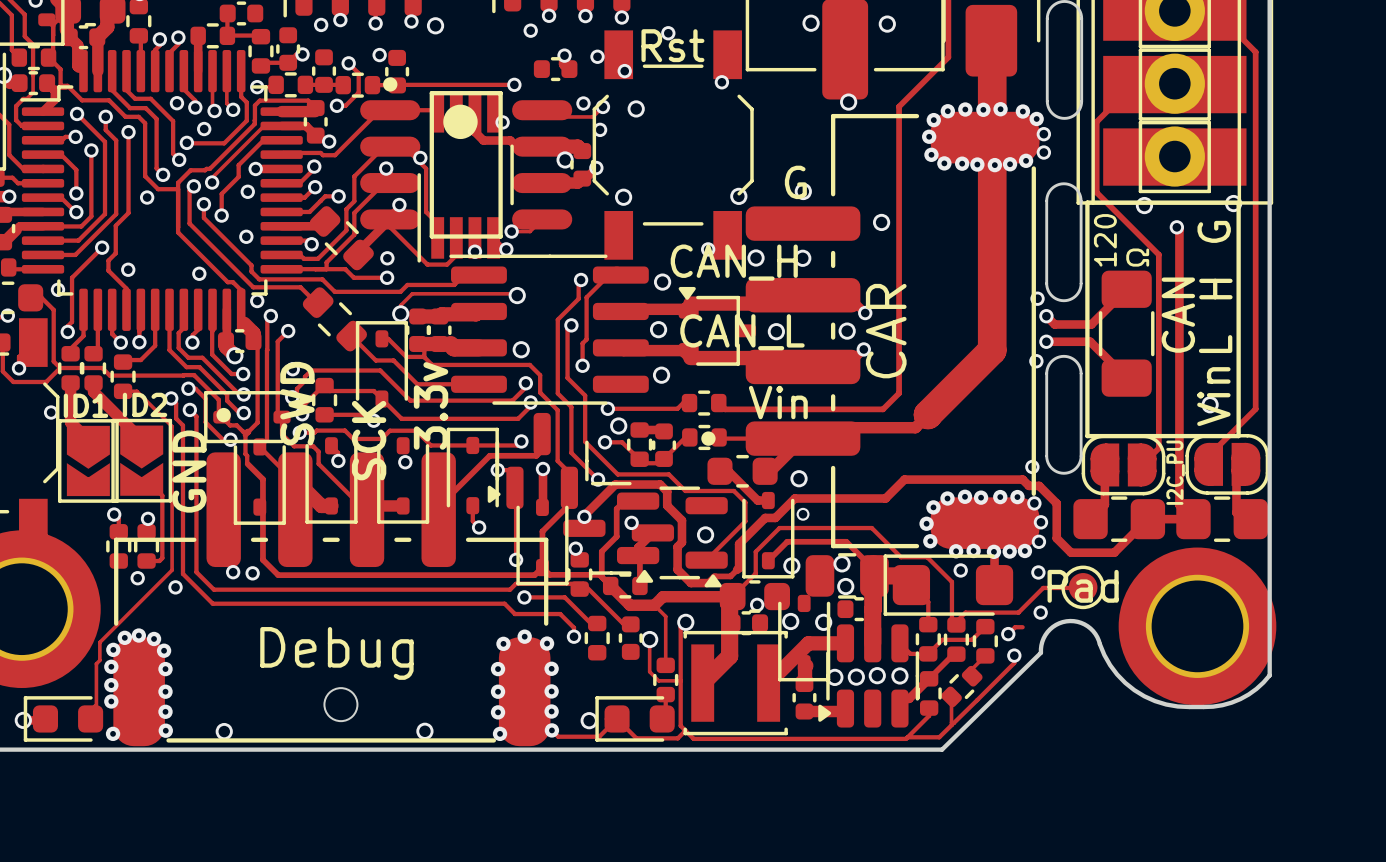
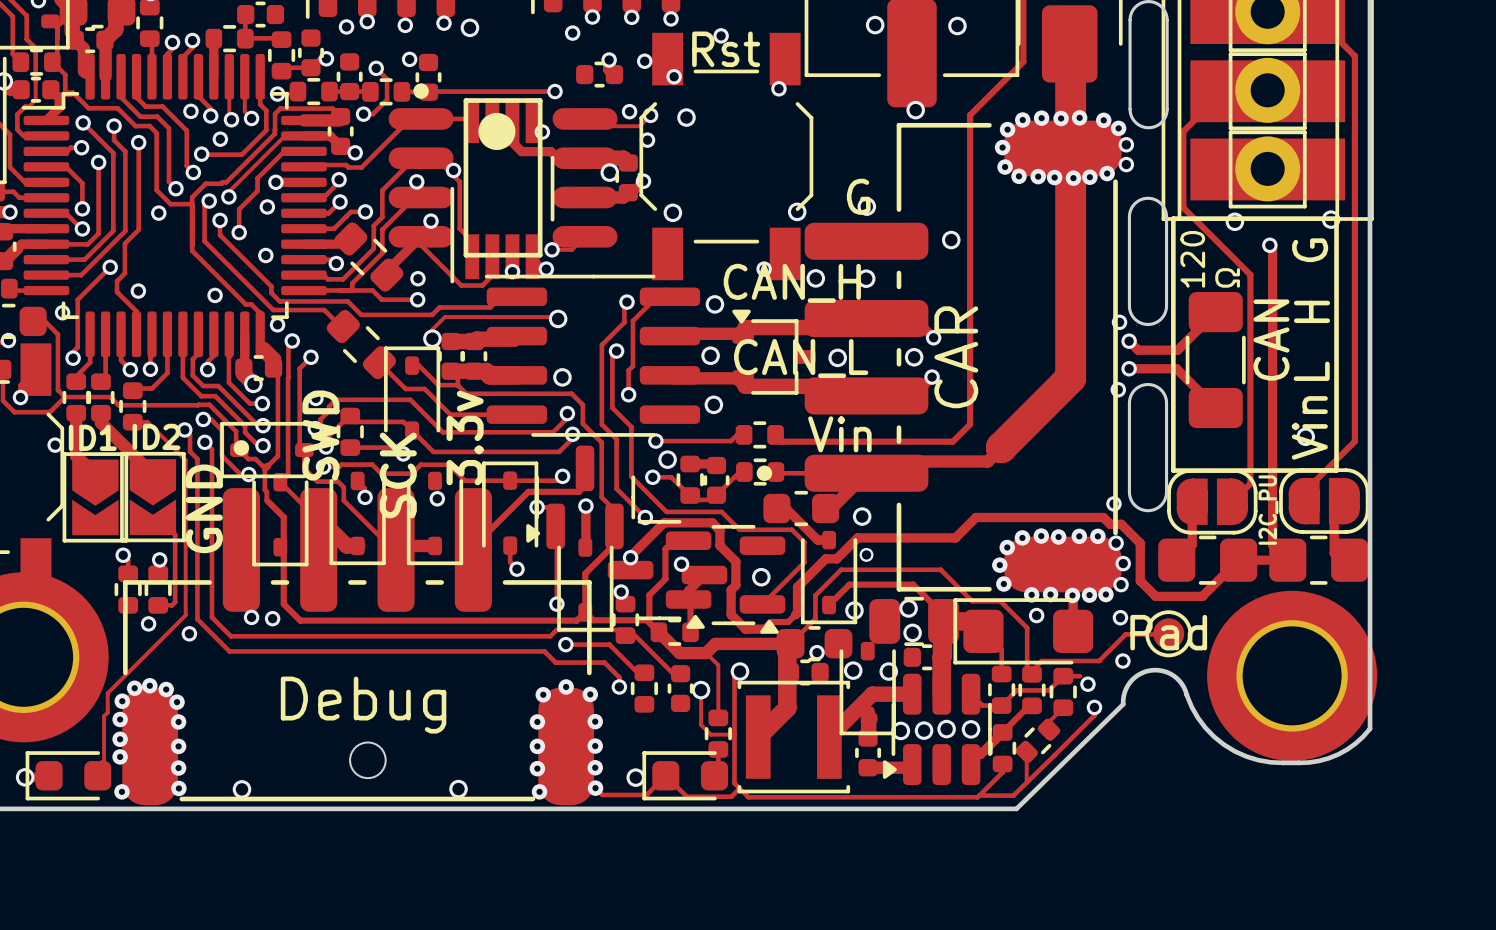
track: none -> (1063, 676) (1079, 676)
track: (1022, 627) (1015, 627) (1008, 634) -> none

